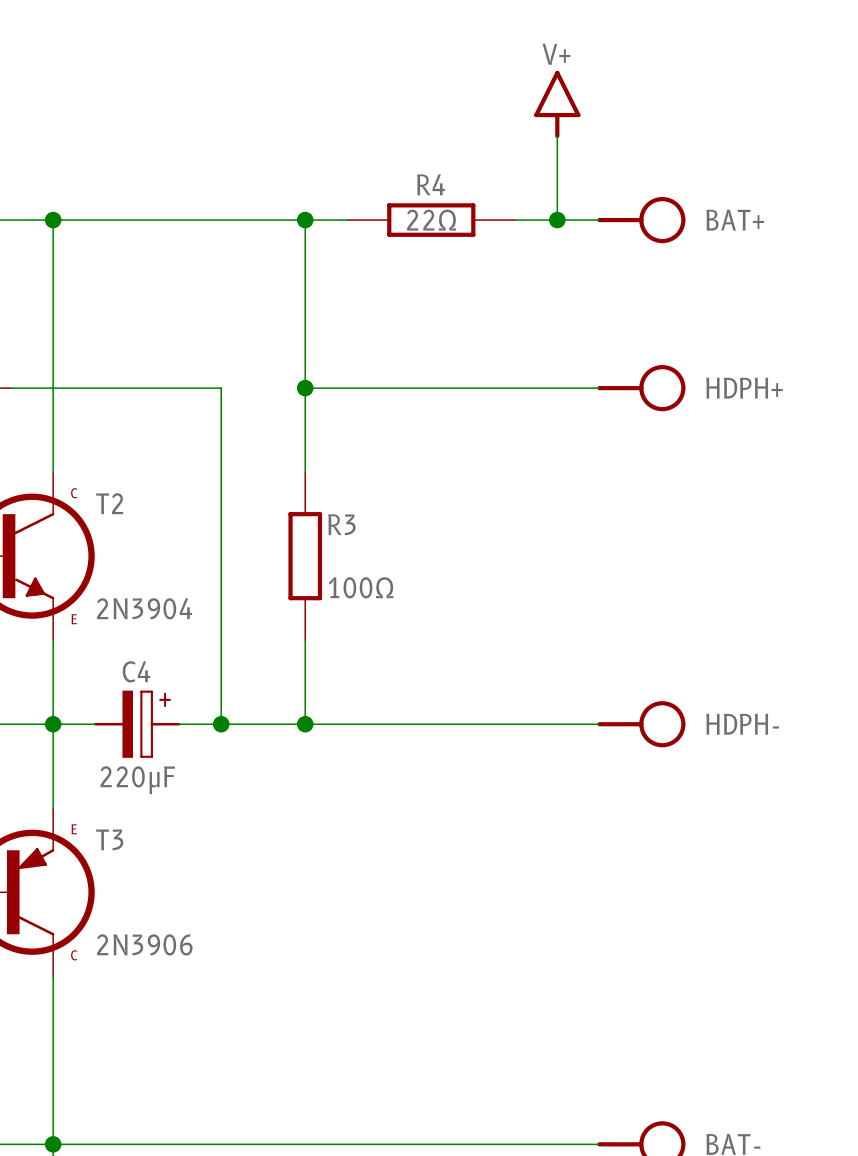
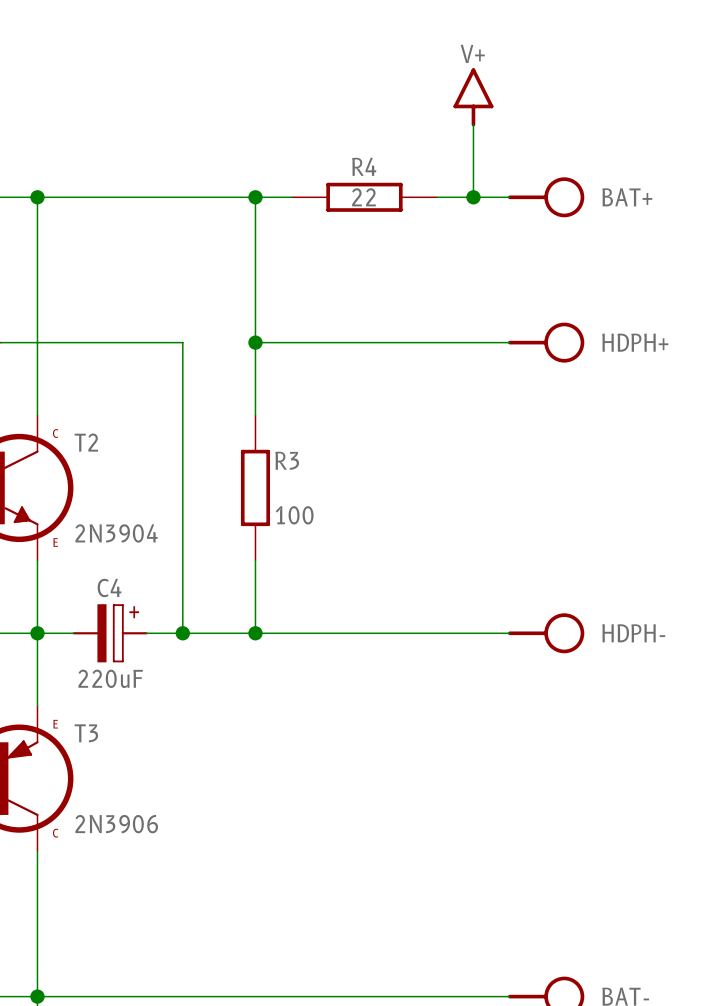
R4 value: 22Ω (431, 220) -> 22 (363, 197)
R3 value: 100Ω (361, 587) -> 100 (294, 515)
C4 value: 220μF (137, 780) -> 220uF (110, 678)

